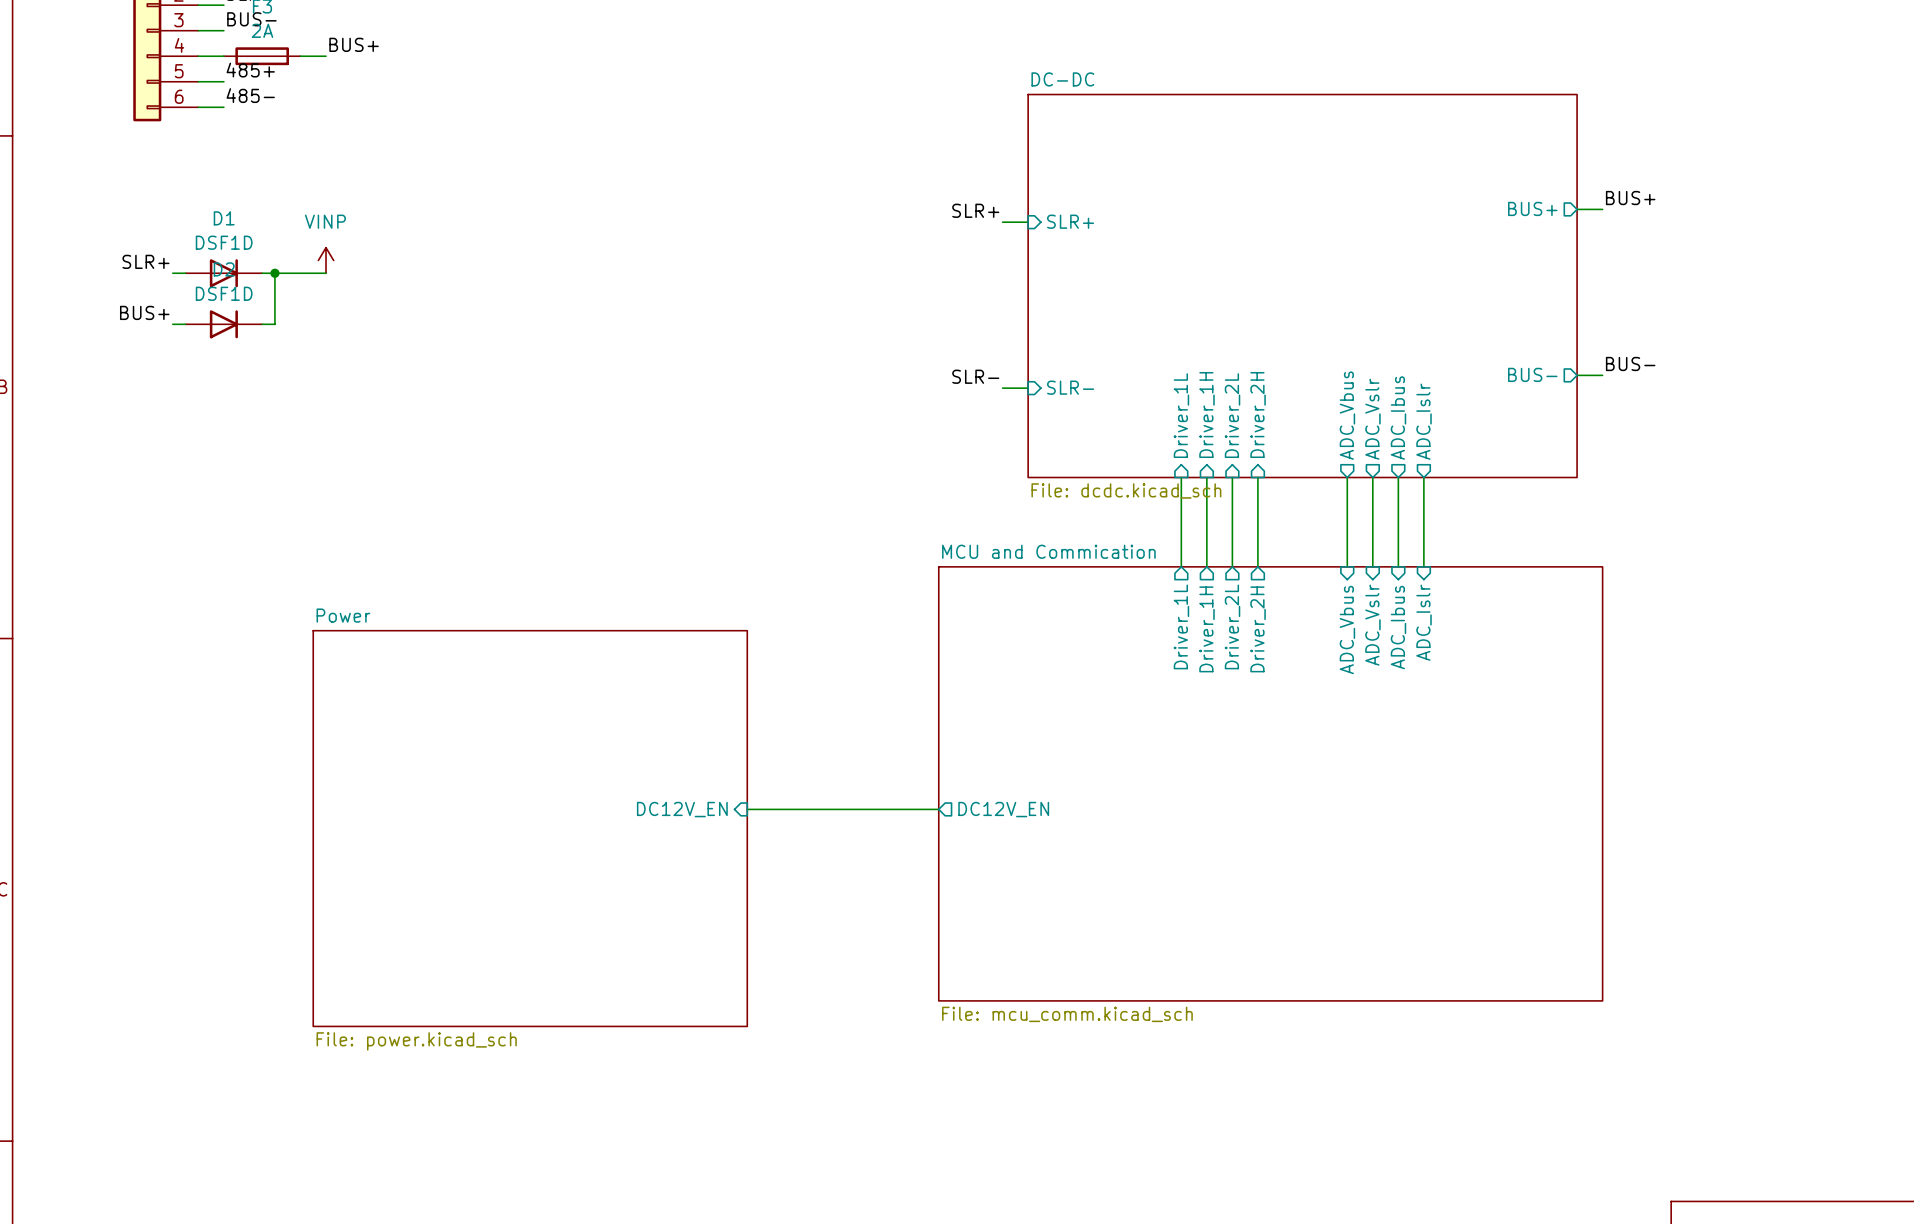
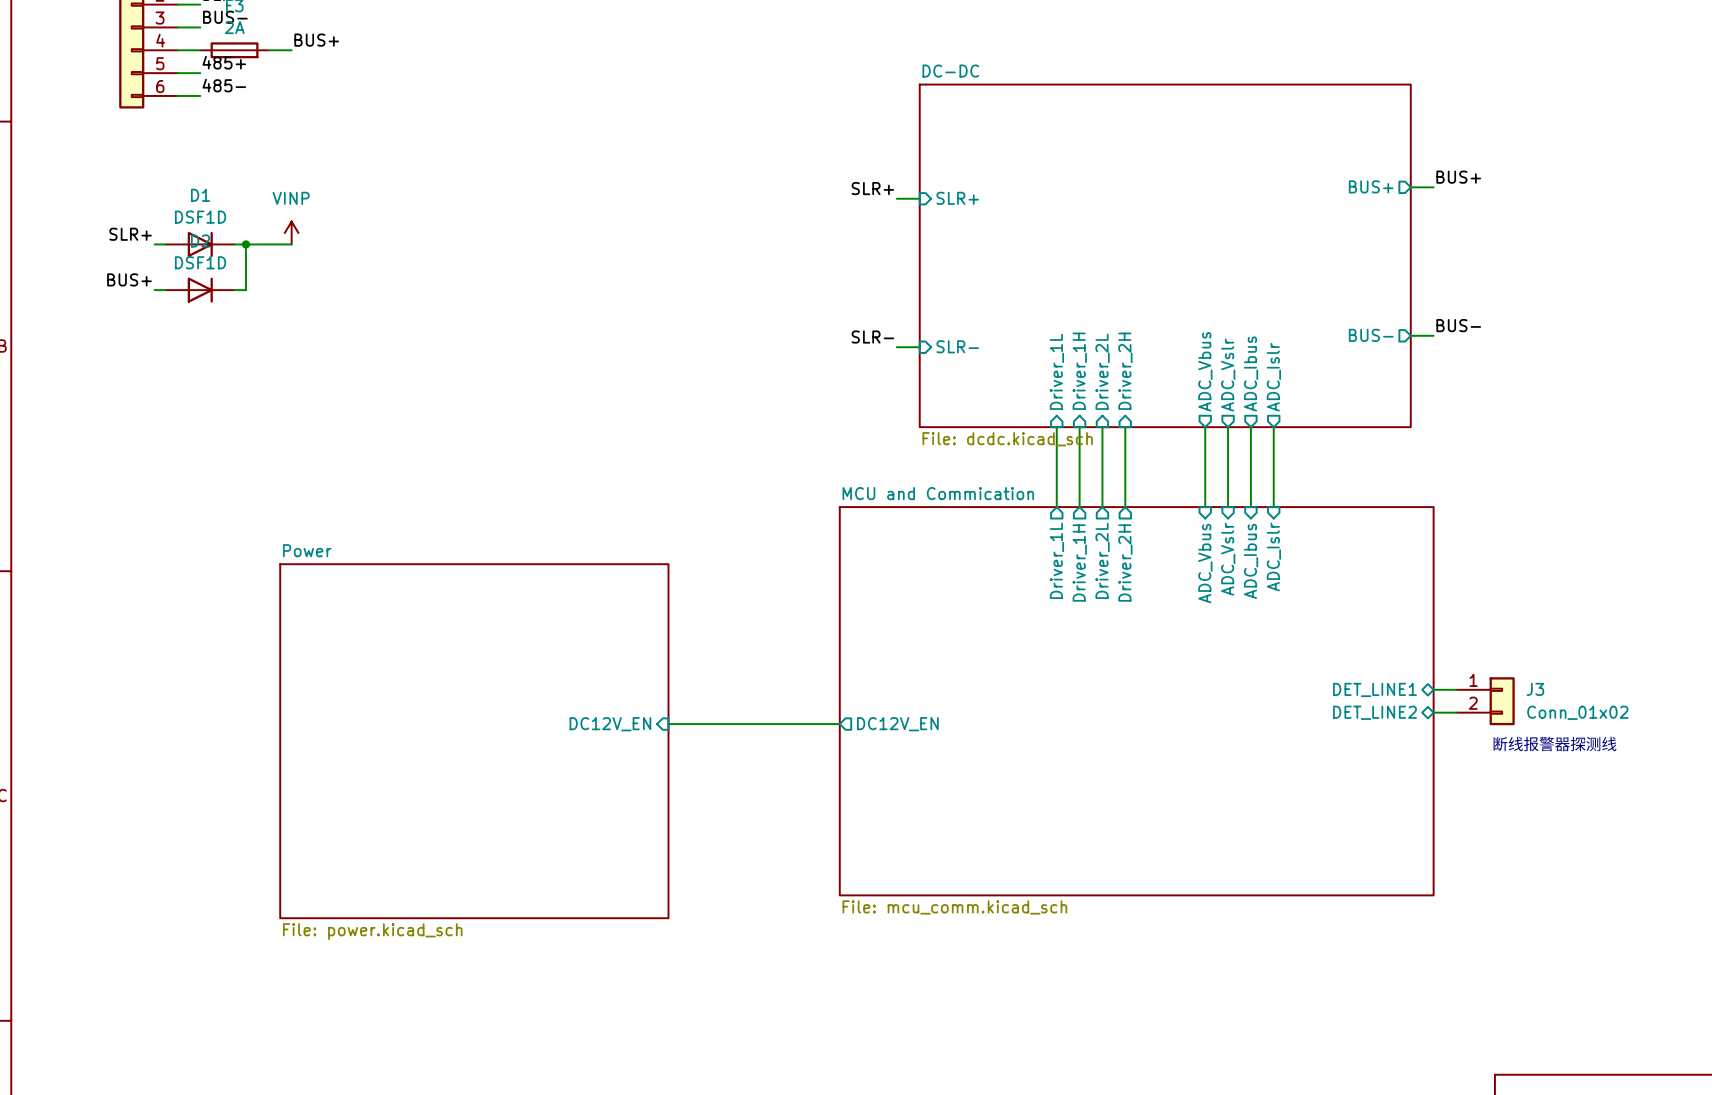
sheet pin: none -> DET_LINE1 (1374, 689)
wire: none -> (1433, 689) (1456, 689)
J3: none -> Conn_01x02 (1485, 701)
sheet pin: none -> DET_LINE2 (1374, 712)
wire: none -> (1433, 712) (1456, 712)
text: none -> 断线报警器探测线 (1555, 744)

